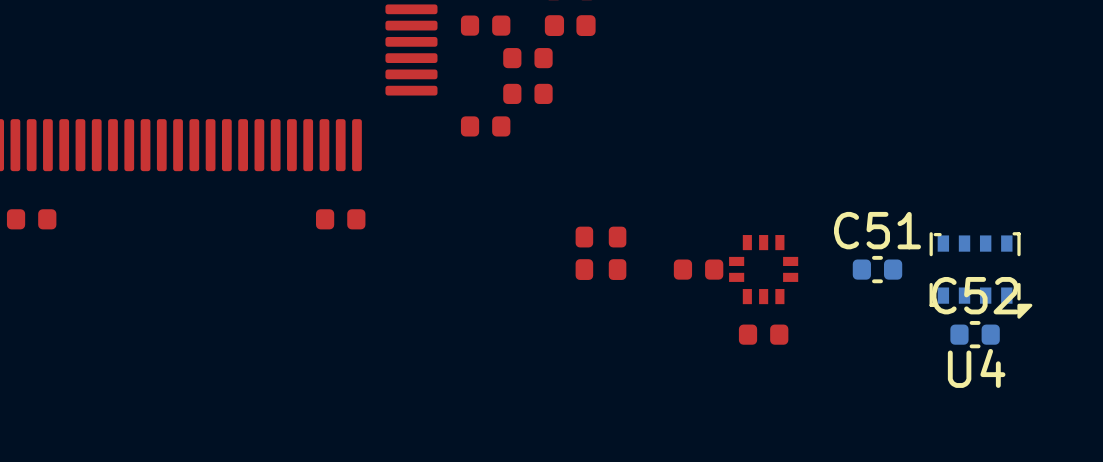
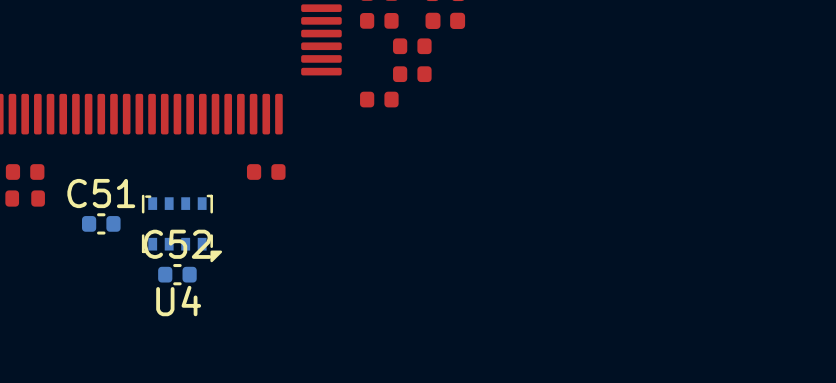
part: (600, 237) -> none
part: none -> (25, 198)
part: (600, 269) -> none
part: (698, 269) -> none
part: (763, 269) -> none
C51 position: (877, 269) -> (101, 223)
U4 position: (980, 275) -> (181, 228)
part: (763, 334) -> none
C52 position: (975, 334) -> (177, 274)

